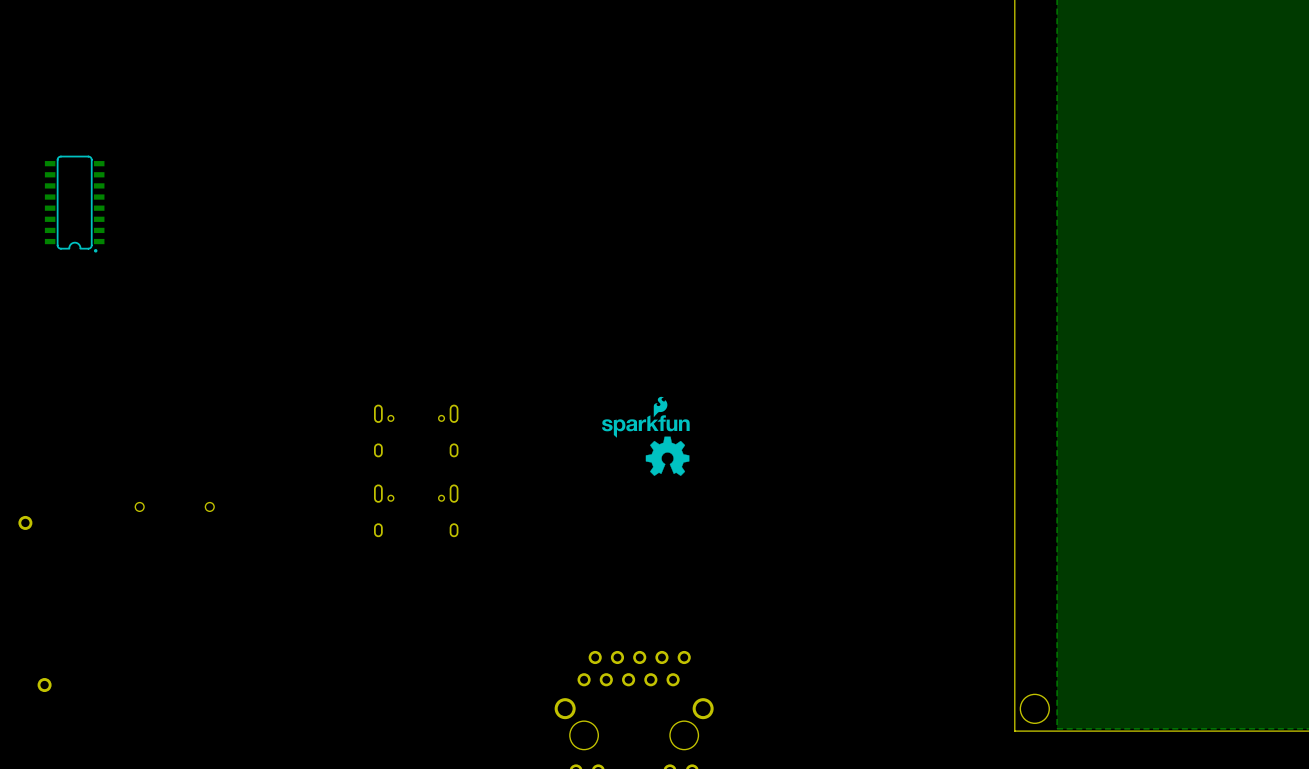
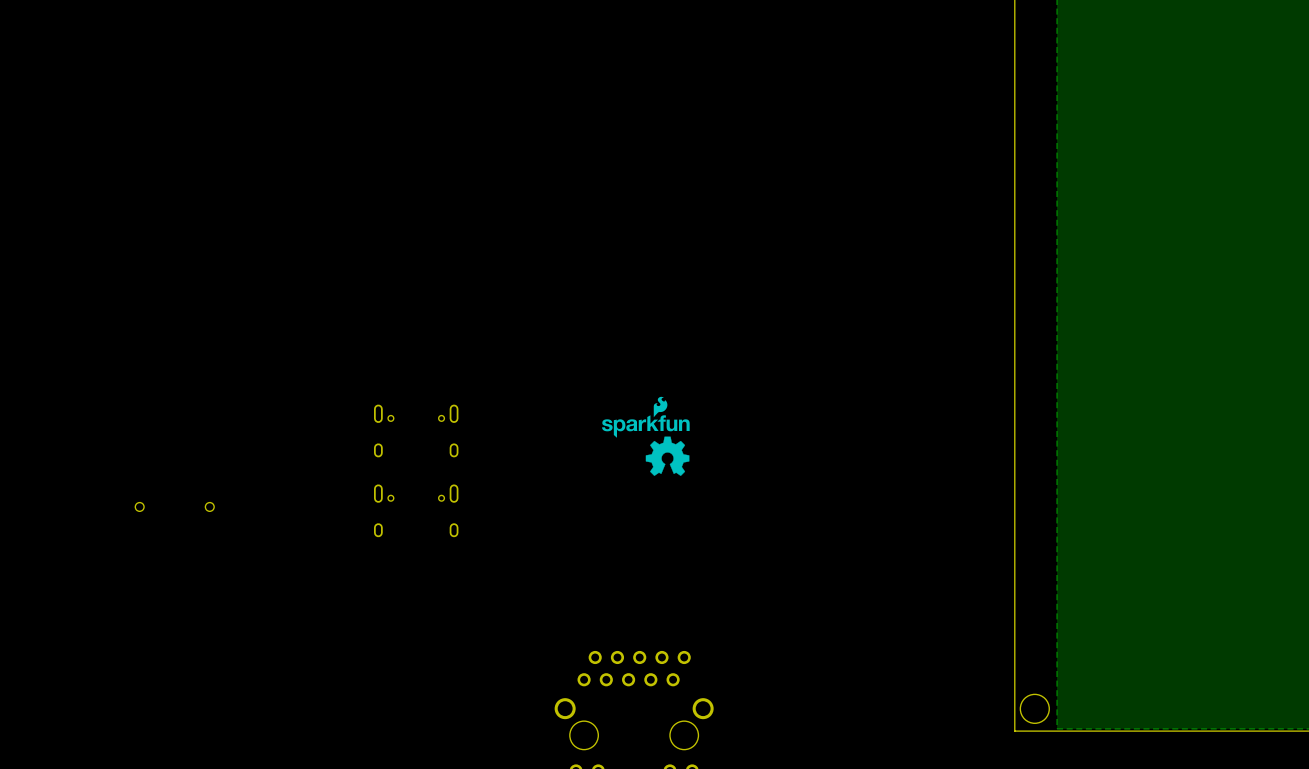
part: (74, 204) -> none
part: (25, 522) -> none
part: (44, 685) -> none

